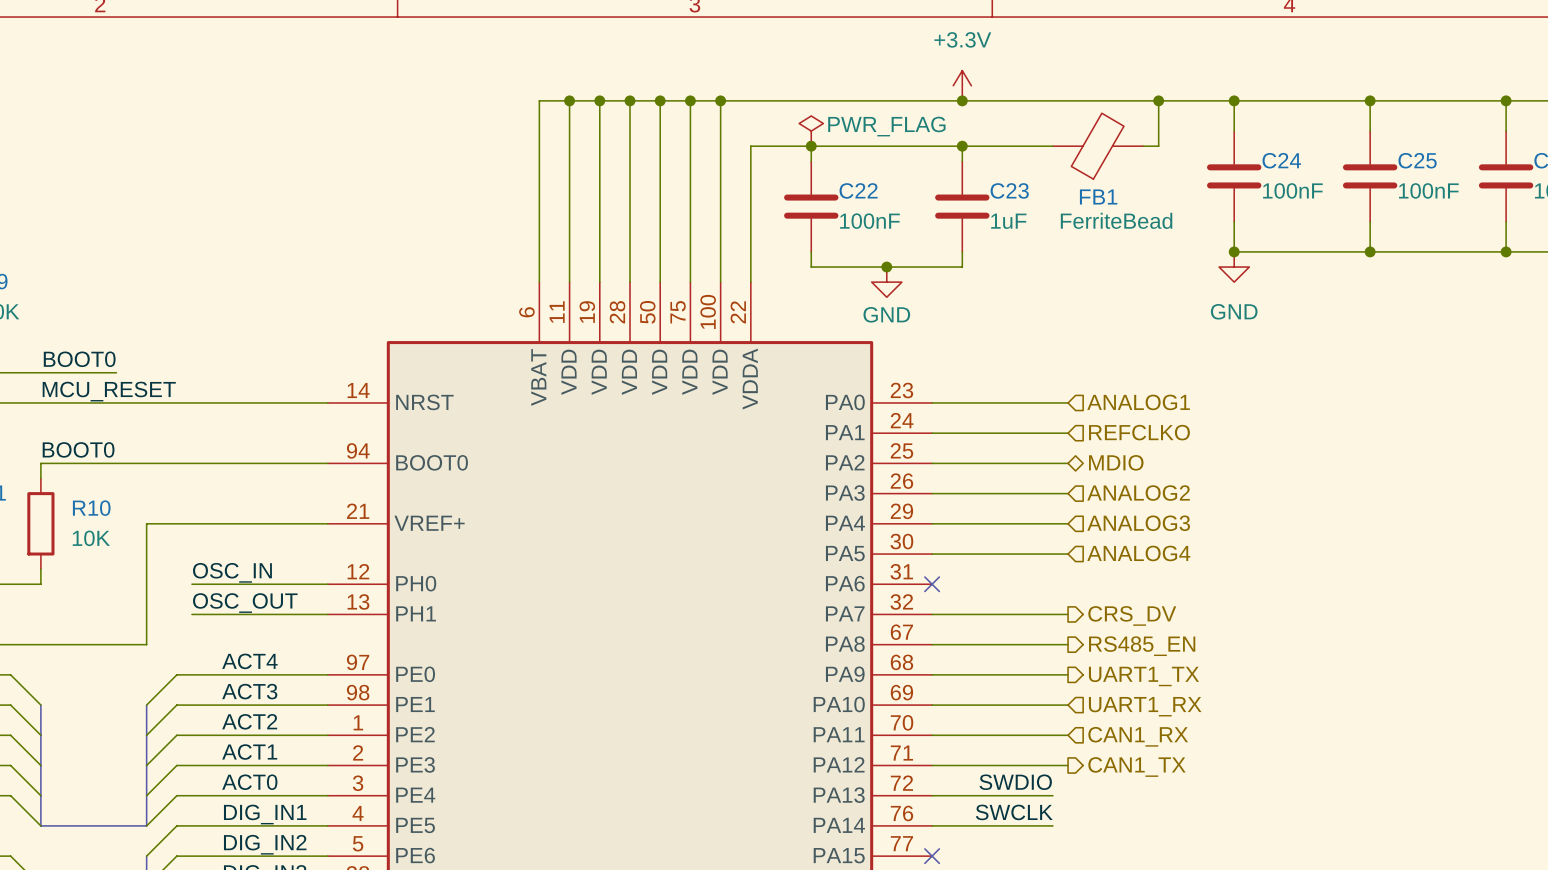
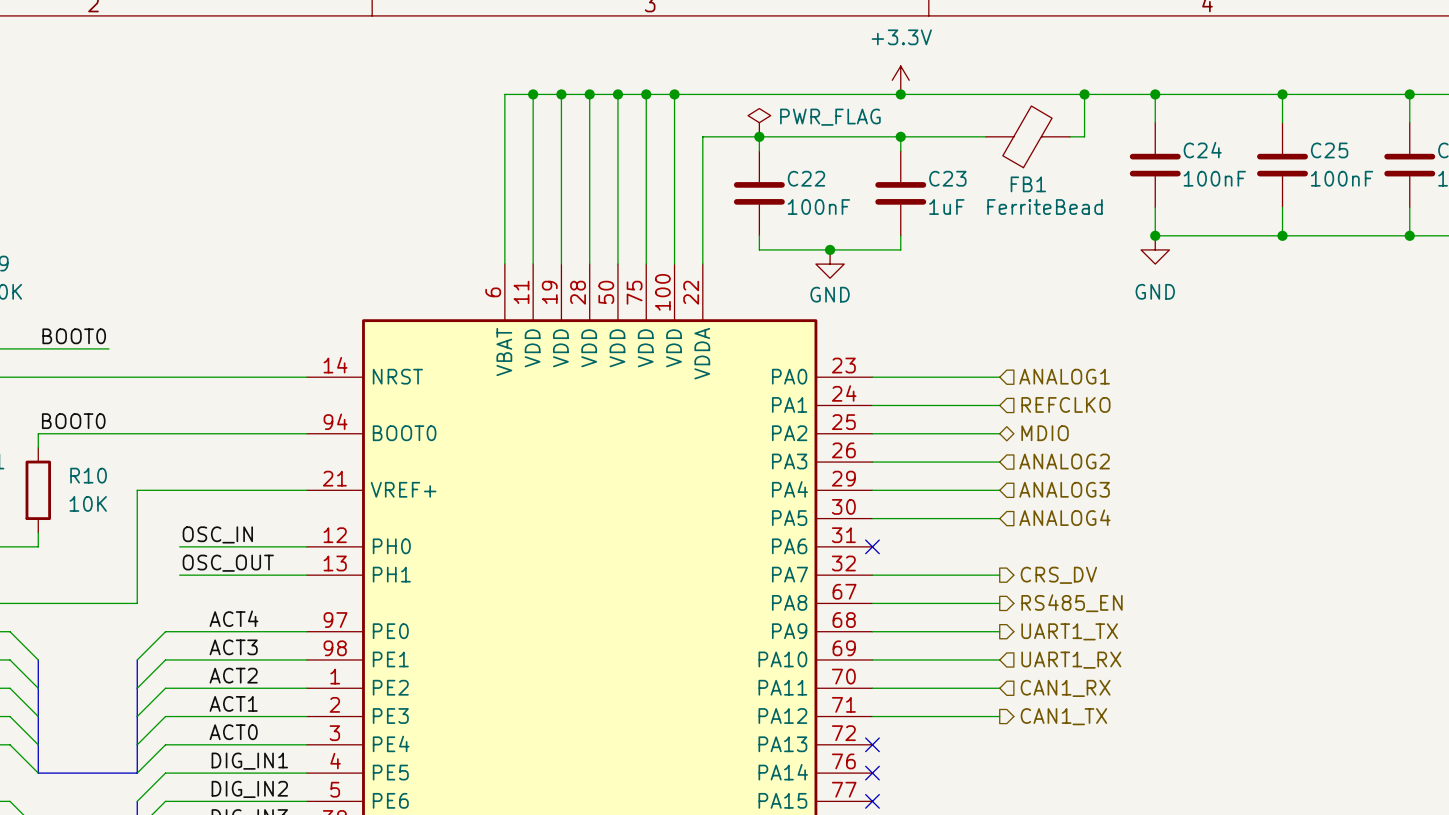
label: MCU_RESET (109, 391) -> none
label: SWDIO (1015, 782) -> none
wire: (932, 795) (1052, 795) -> none
no-connect mark: none -> (872, 744)
label: SWCLK (1014, 812) -> none
wire: (932, 825) (1052, 825) -> none
no-connect mark: none -> (872, 773)

